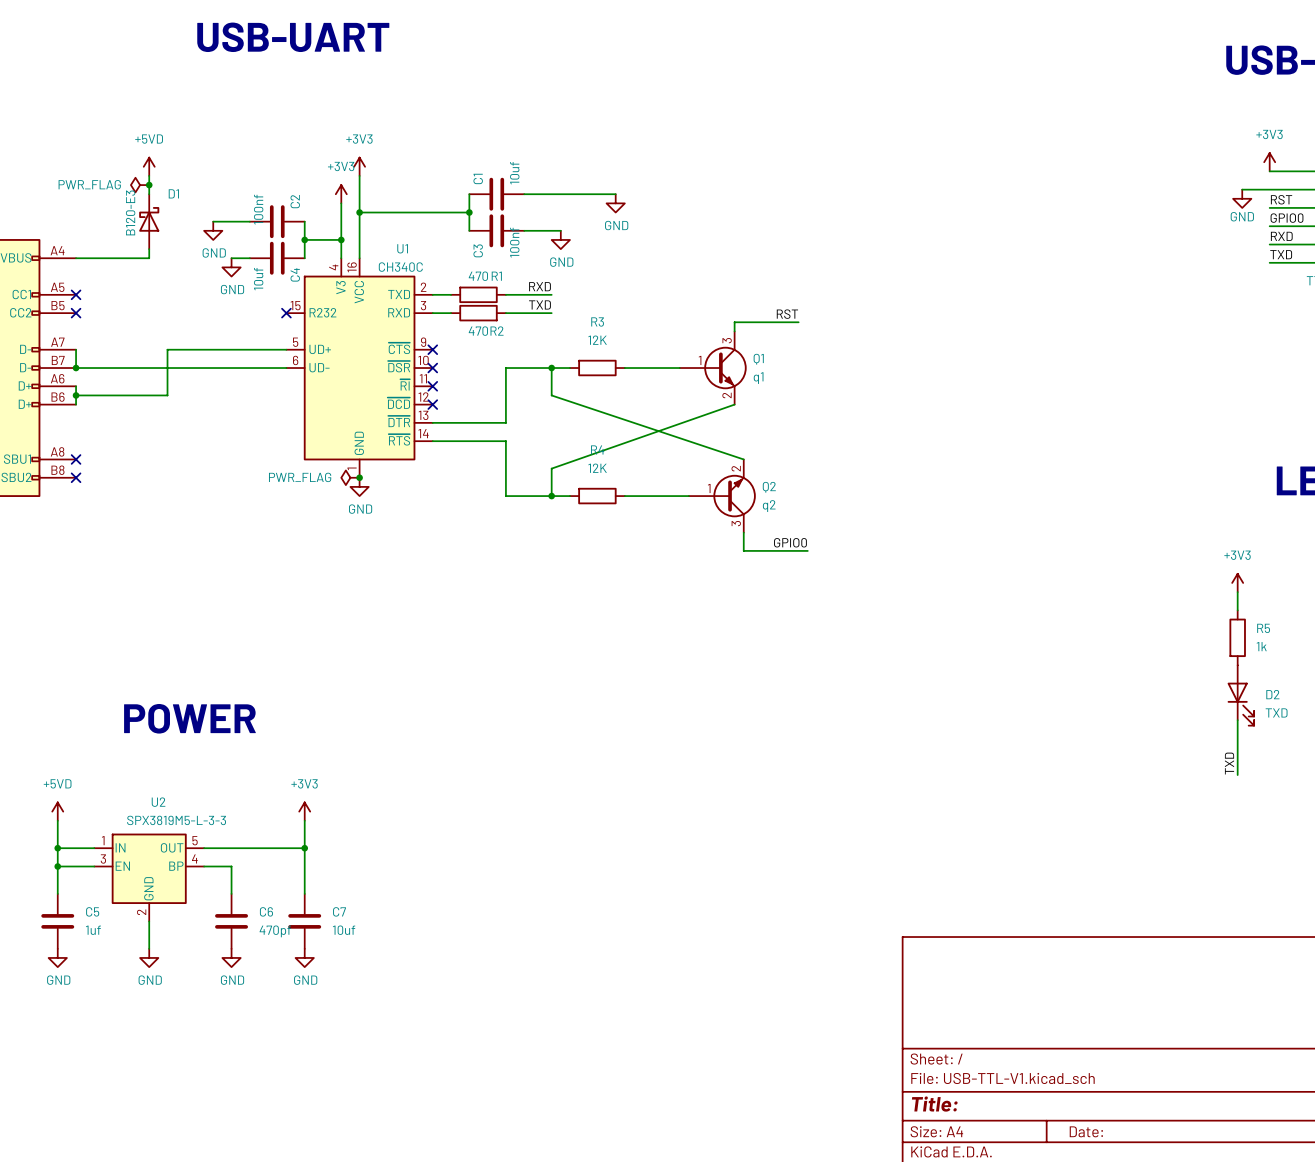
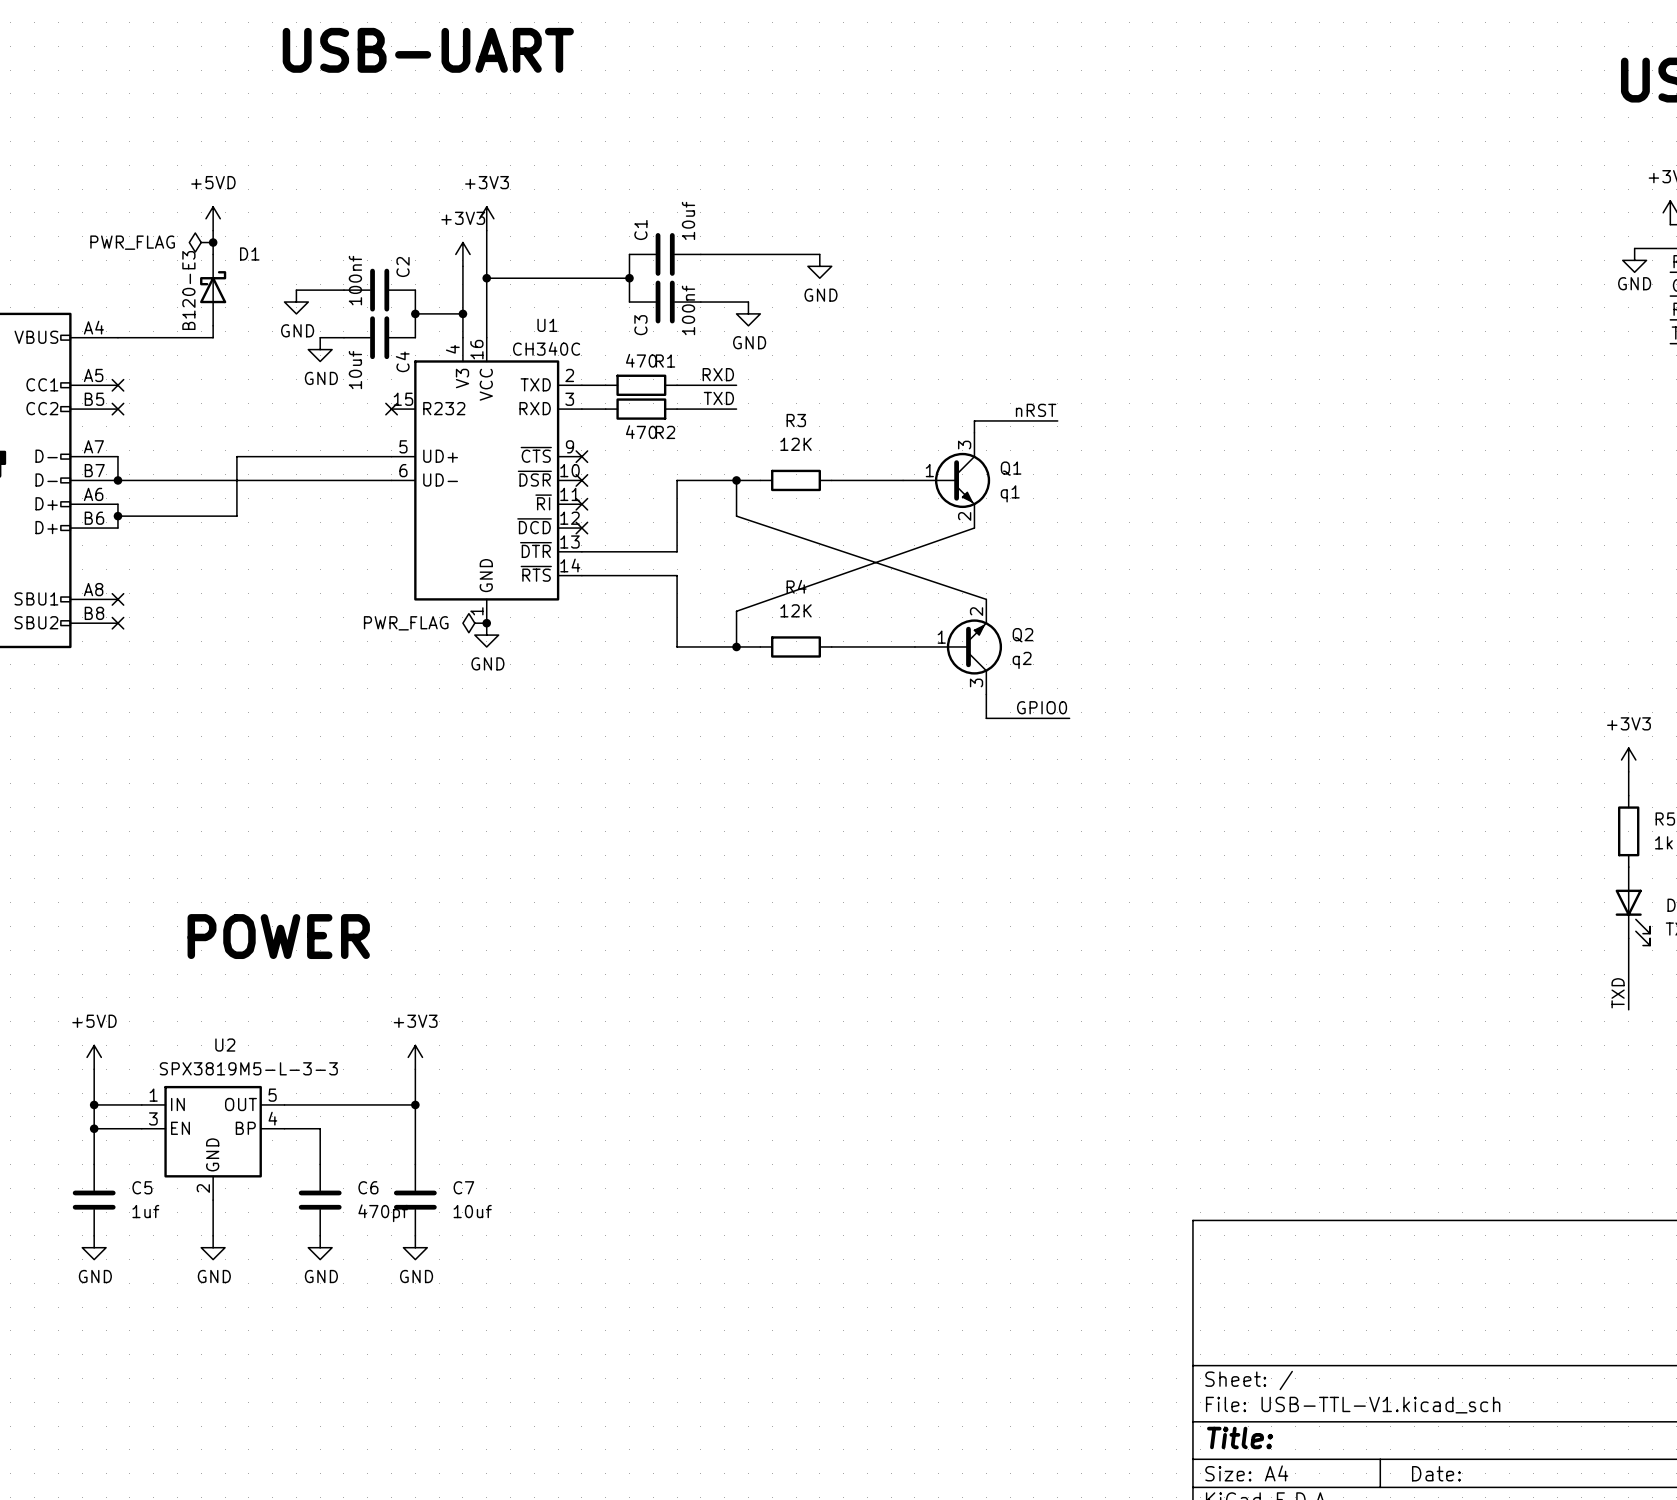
label: RST (787, 314) -> nRST (1036, 410)

